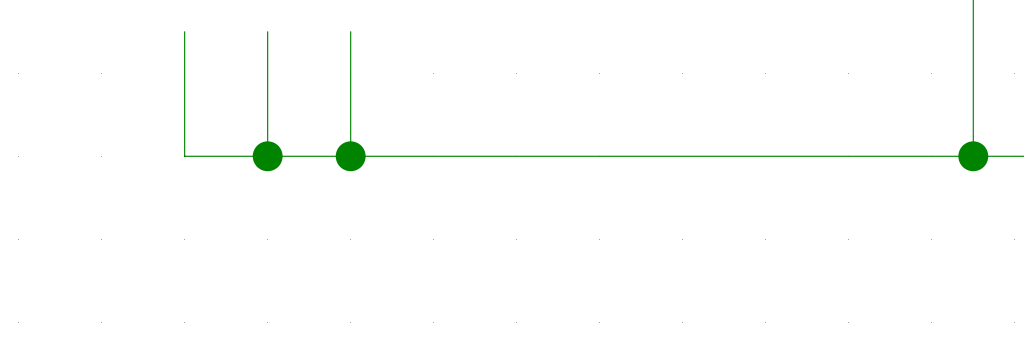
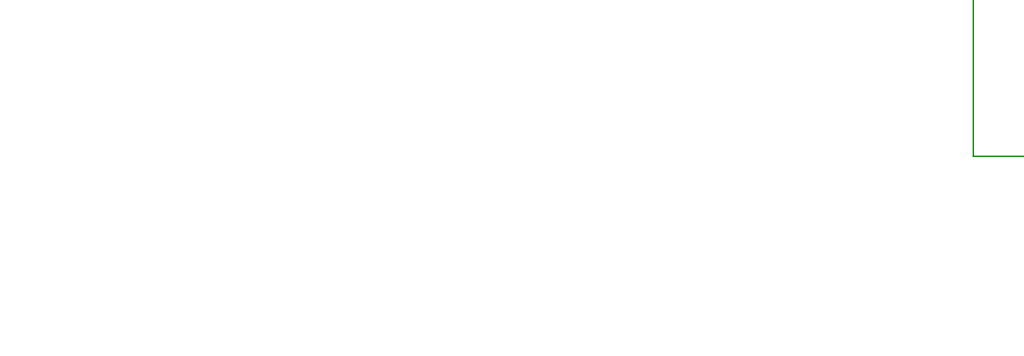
wire: (184, 31) (184, 156) (973, 156) -> none
wire: (267, 31) (267, 156) -> none
wire: (350, 31) (350, 156) -> none
junction: (267, 156) -> none
junction: (350, 156) -> none
junction: (973, 156) -> none

